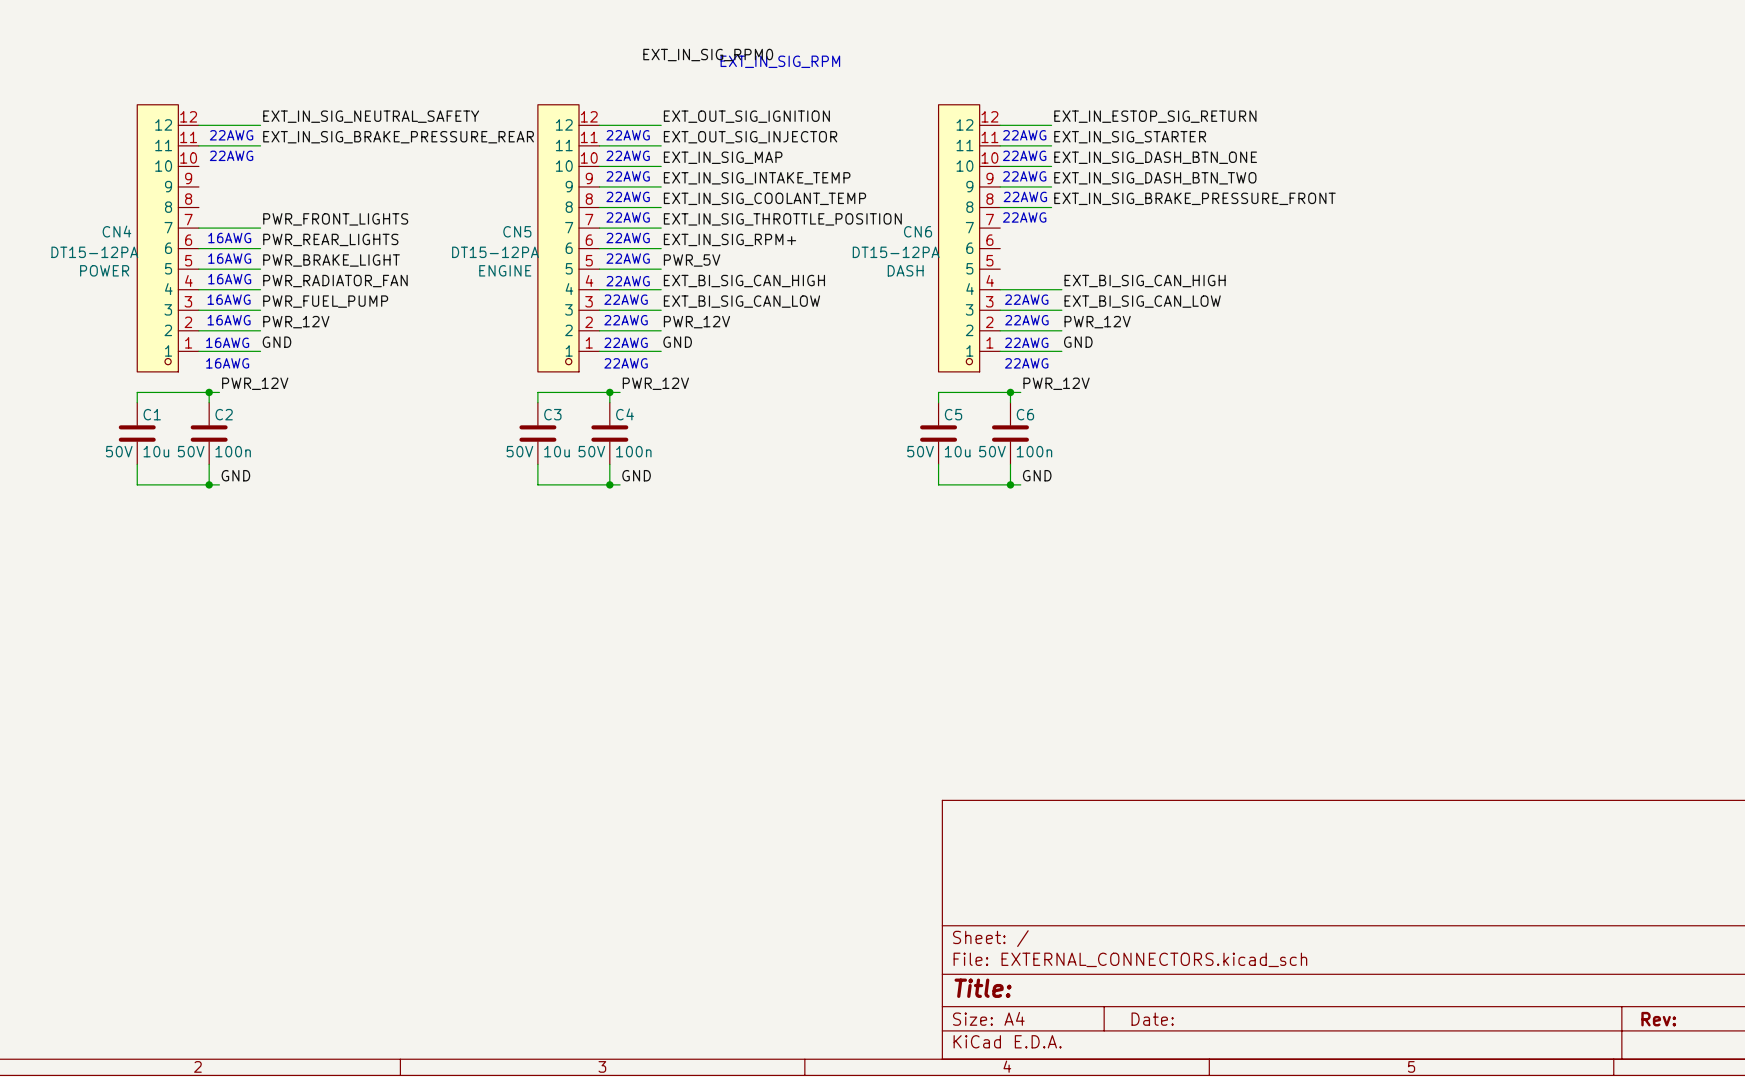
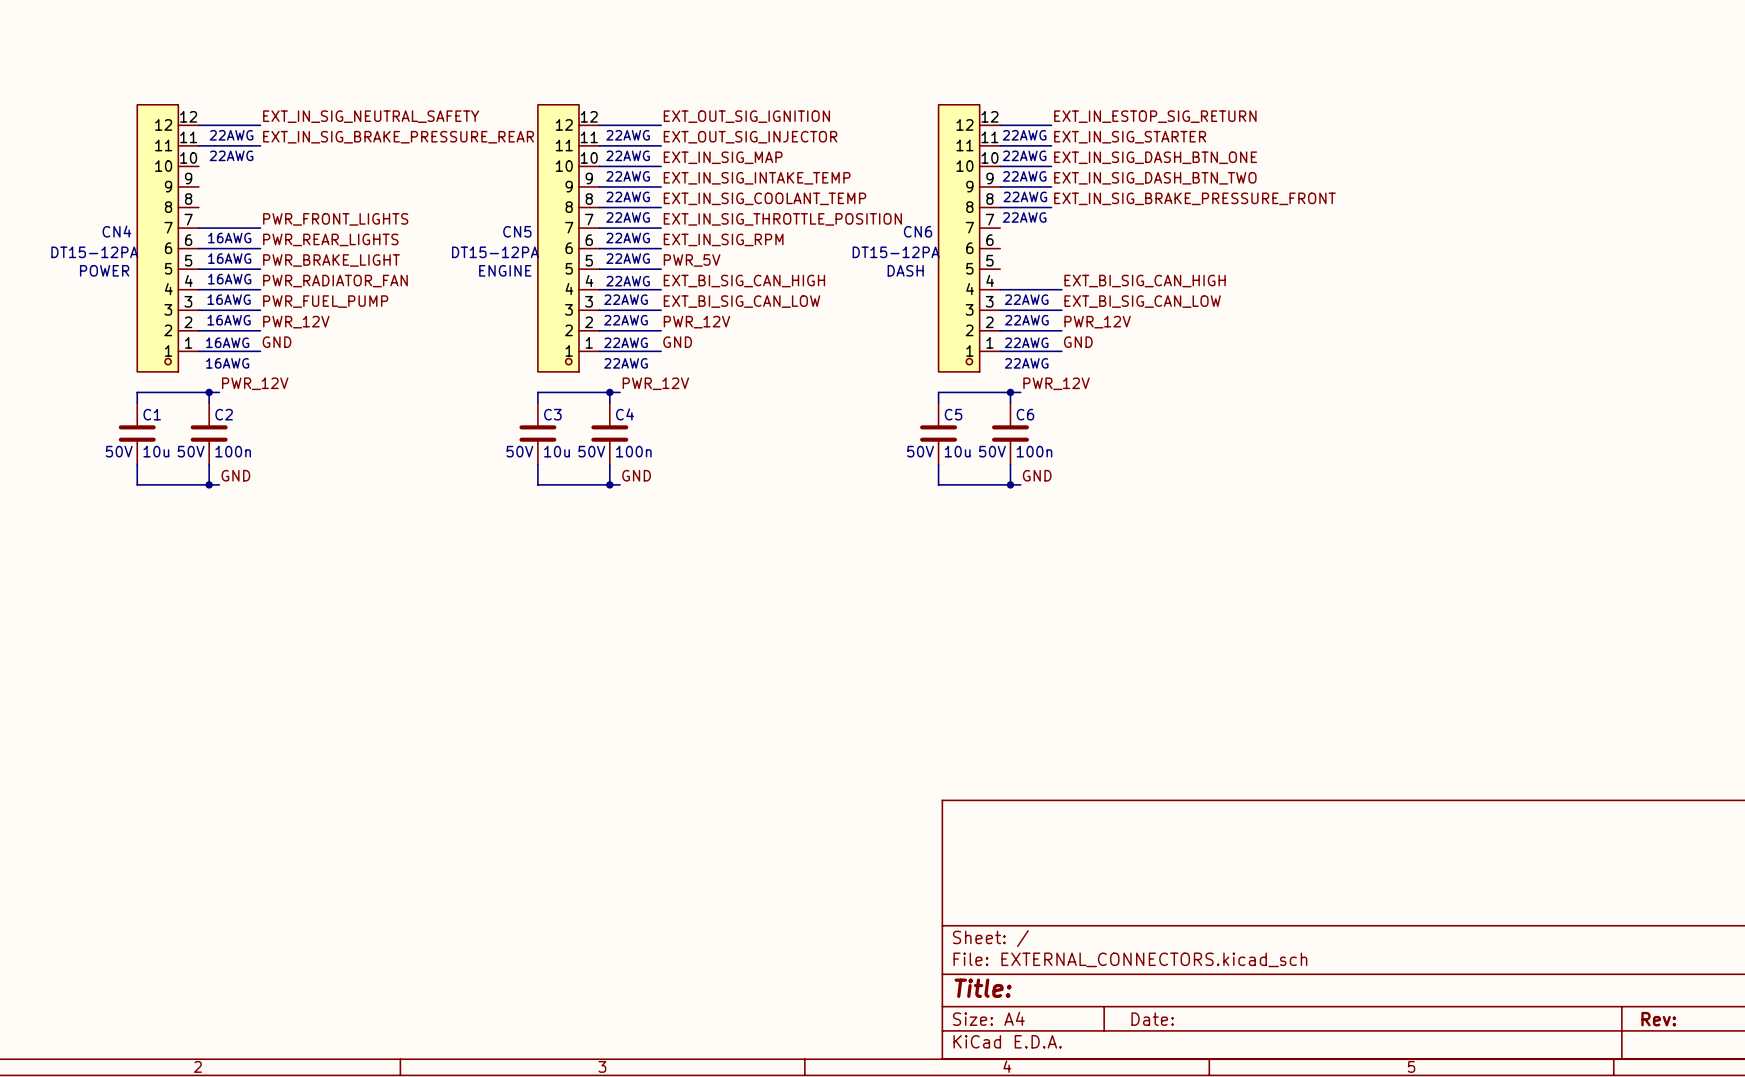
label: EXT_IN_SIG_RPM0 (708, 55) -> none
text: EXT_IN_SIG_RPM (780, 61) -> none
label: EXT_IN_SIG_RPM+ (730, 239) -> EXT_IN_SIG_RPM (723, 239)

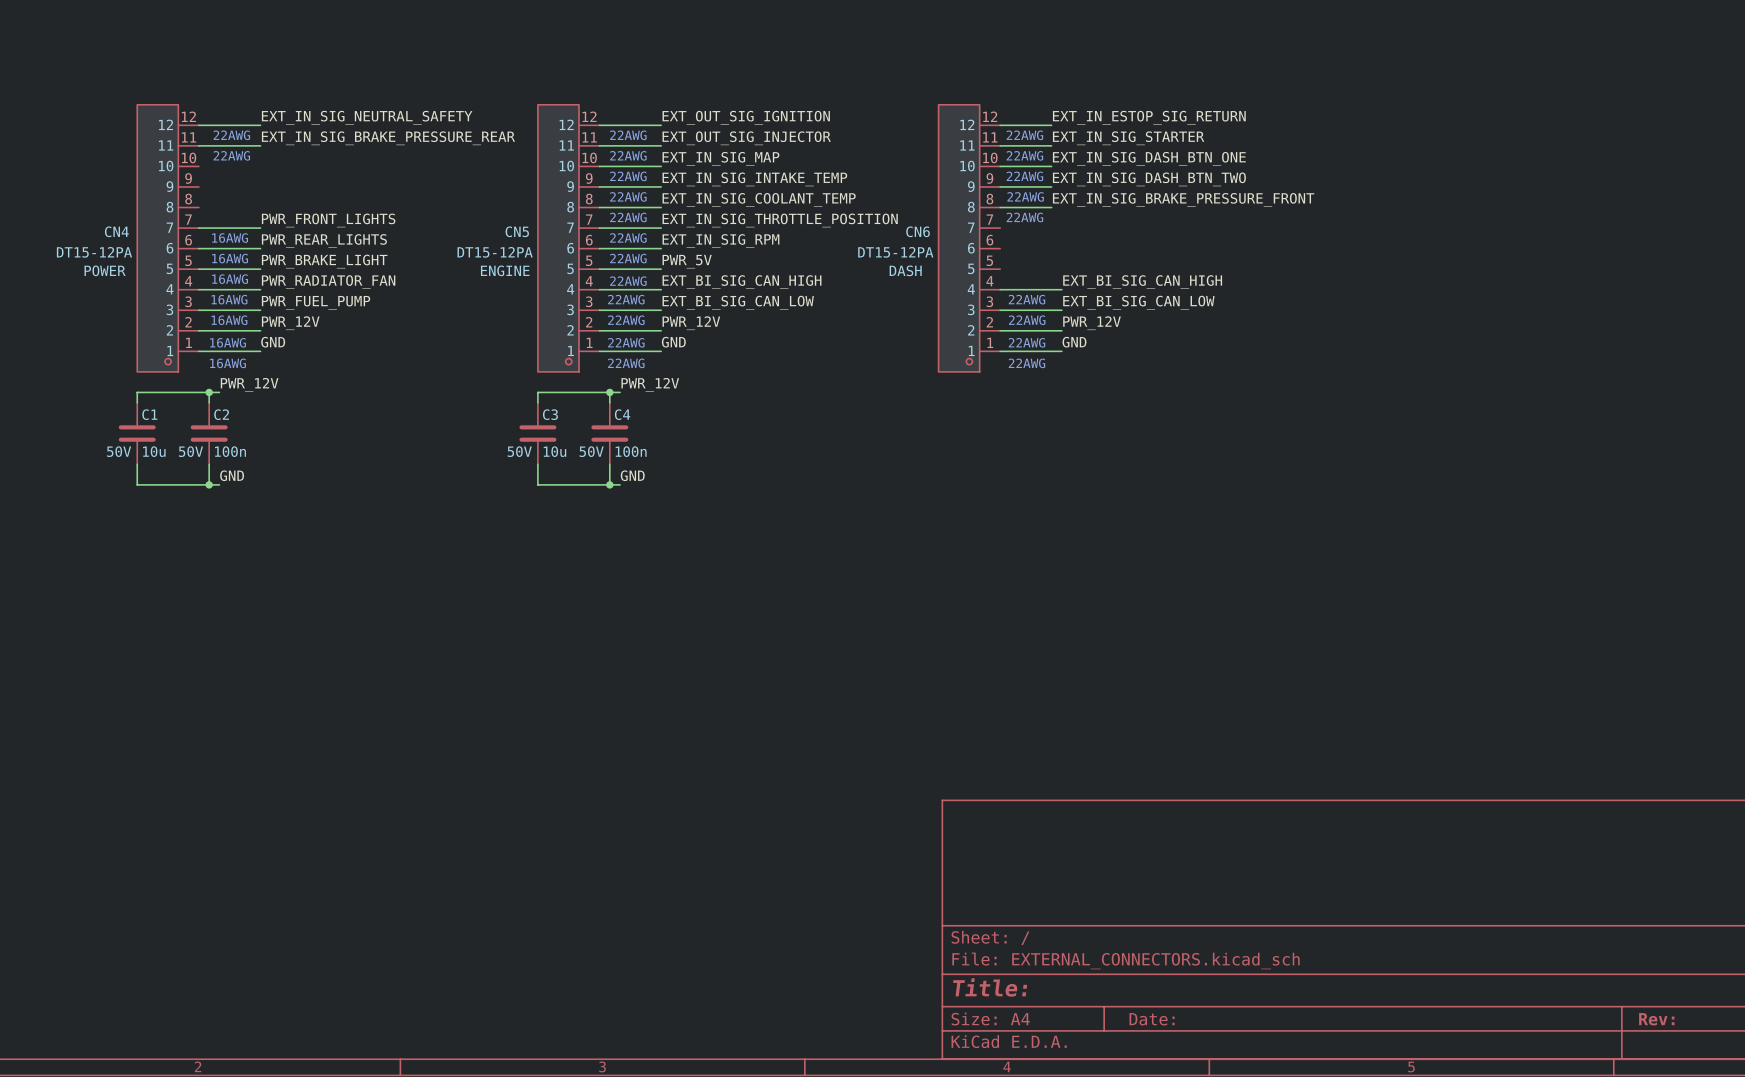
label: PWR_12V (1056, 383) -> none
wire: (1010, 392) (1010, 402) -> none
junction: (1010, 392) -> none
wire: (1020, 392) (938, 392) (938, 402) -> none
C5: 10u (938, 433) -> none
C6: 100n (1010, 433) -> none
wire: (938, 464) (938, 484) (1020, 484) -> none
wire: (1010, 464) (1010, 484) -> none
label: GND (1037, 475) -> none
junction: (1010, 484) -> none

